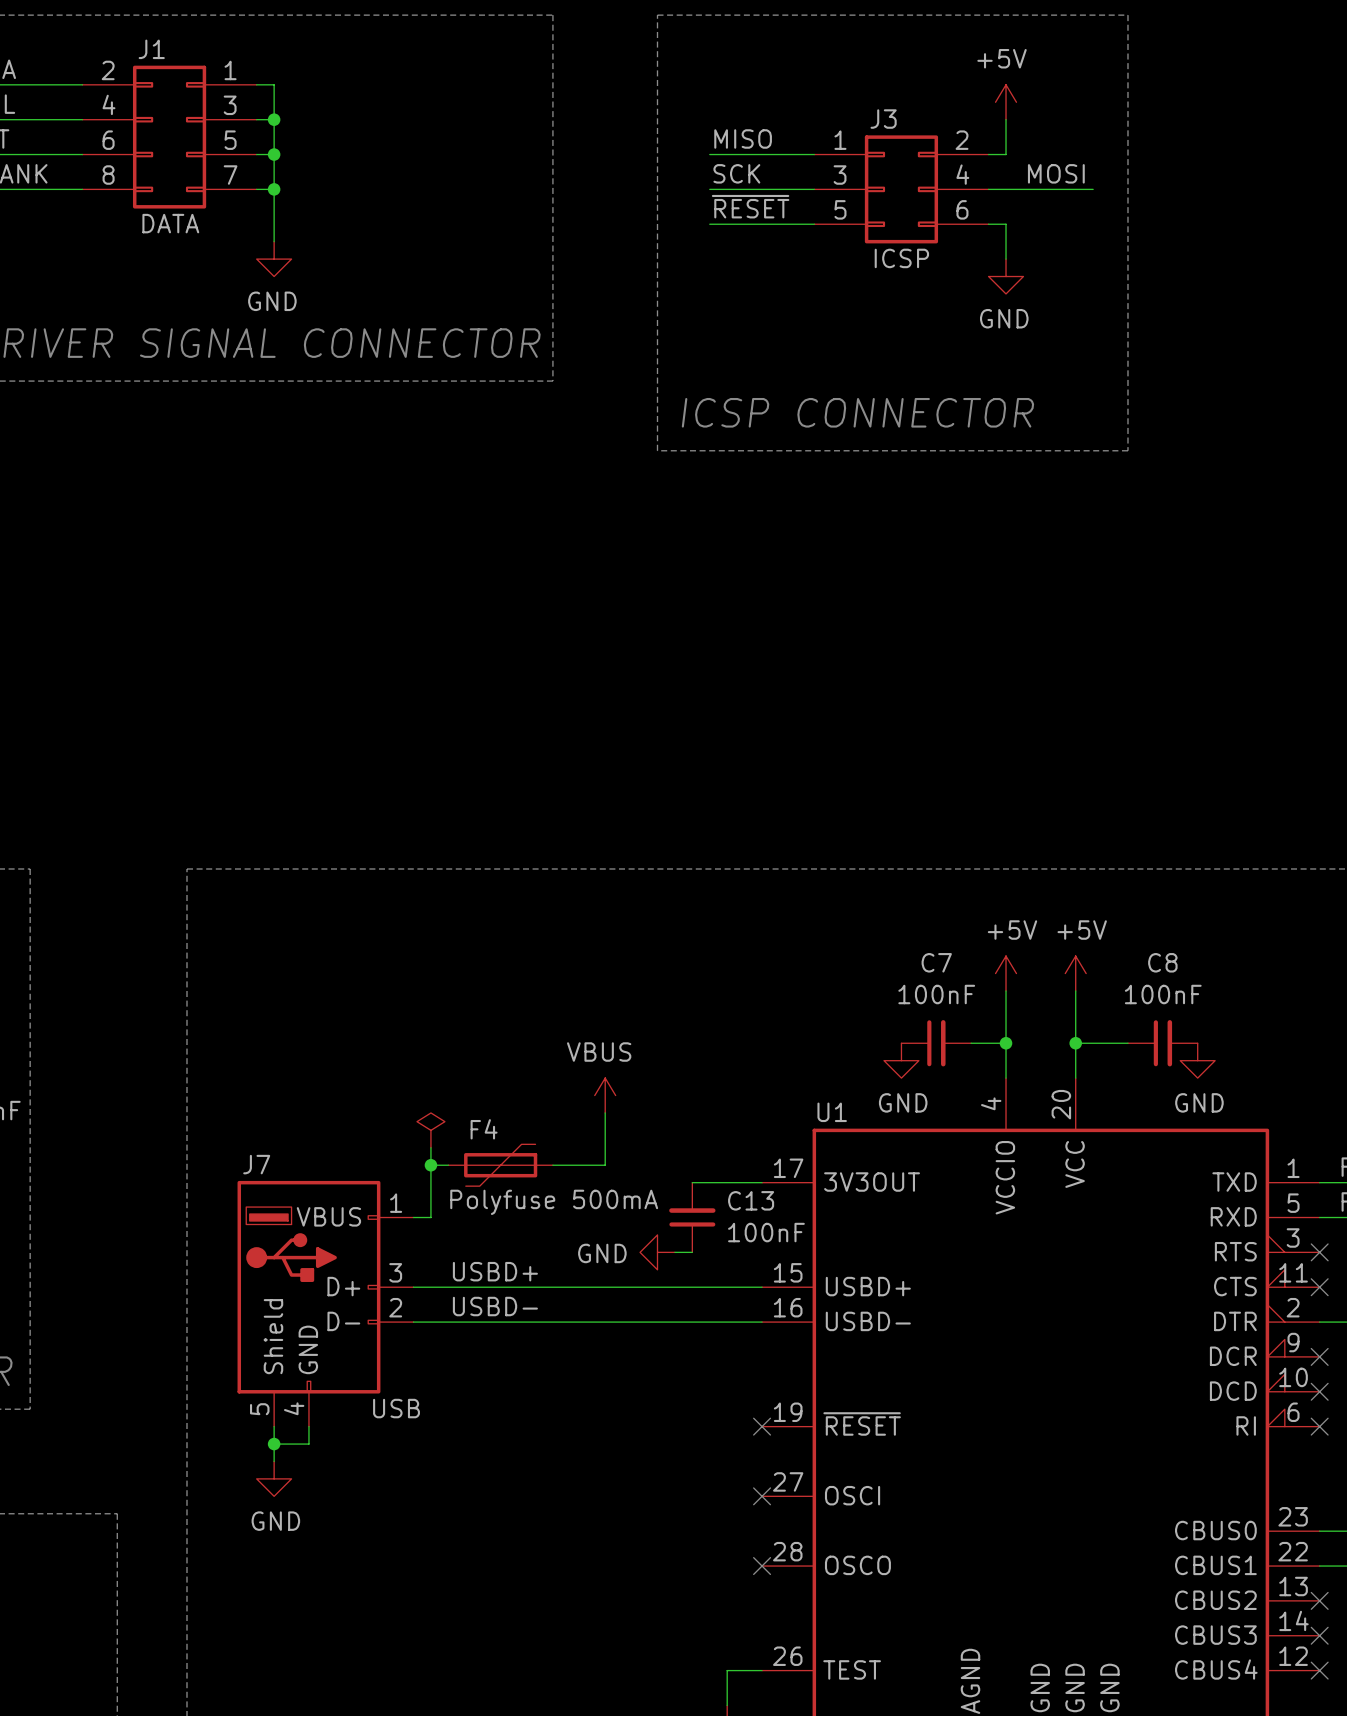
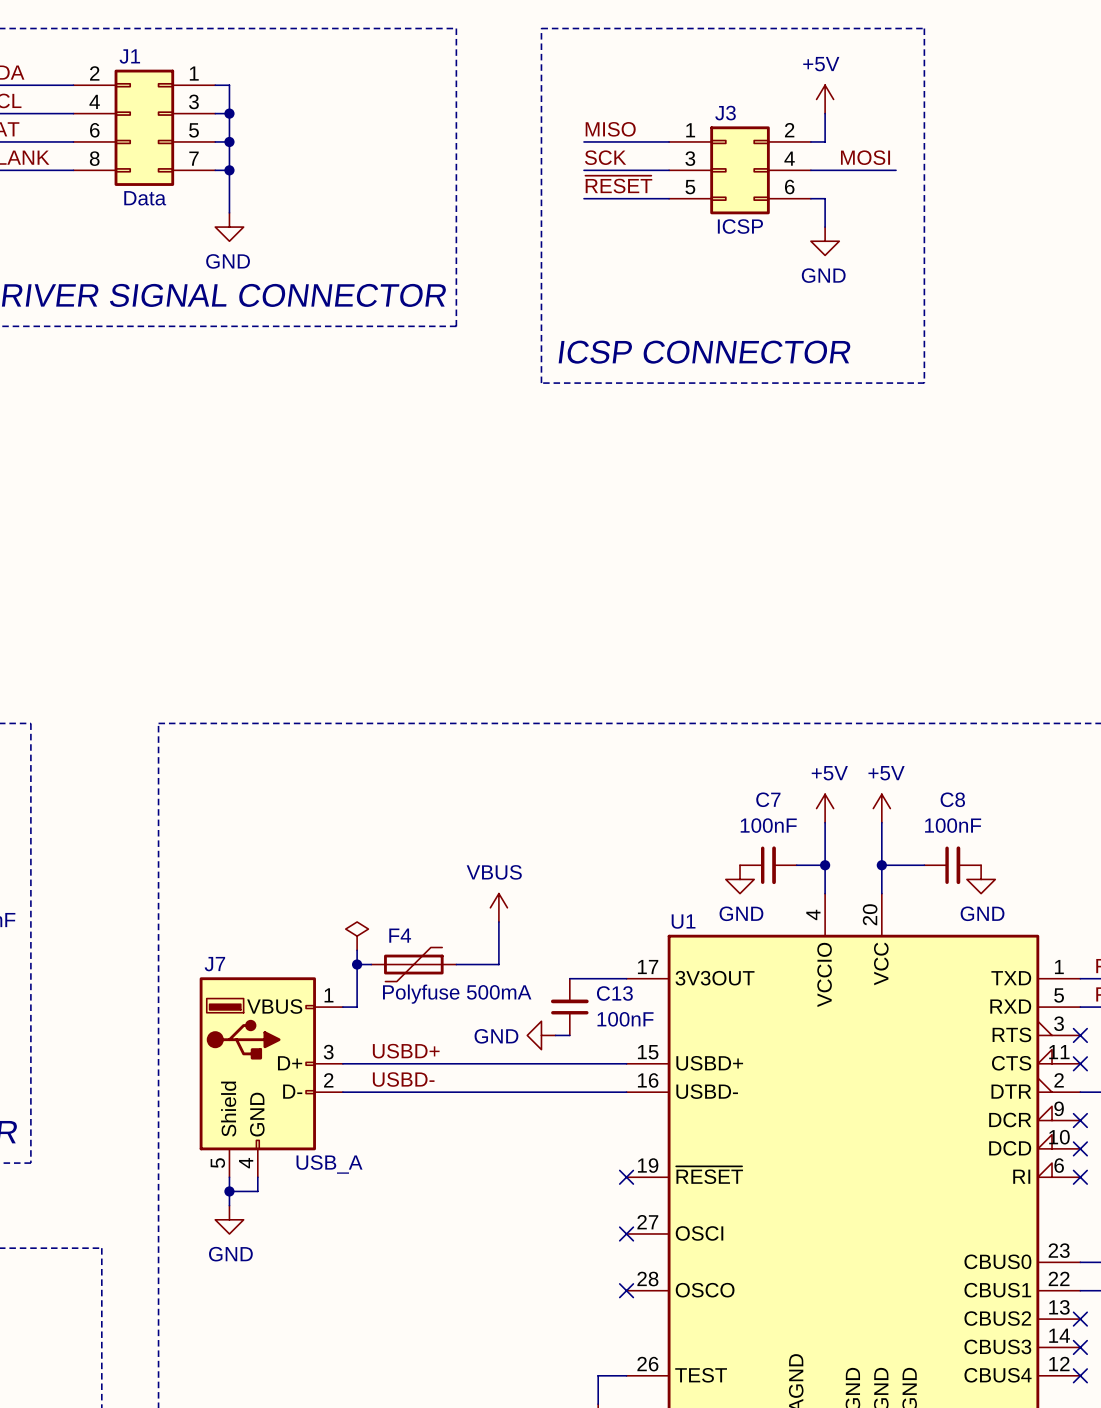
J1 text: none -> Data (145, 198)
J1 value: DATA (170, 223) -> none
J7 value: USB (396, 1408) -> USB_A (329, 1164)

